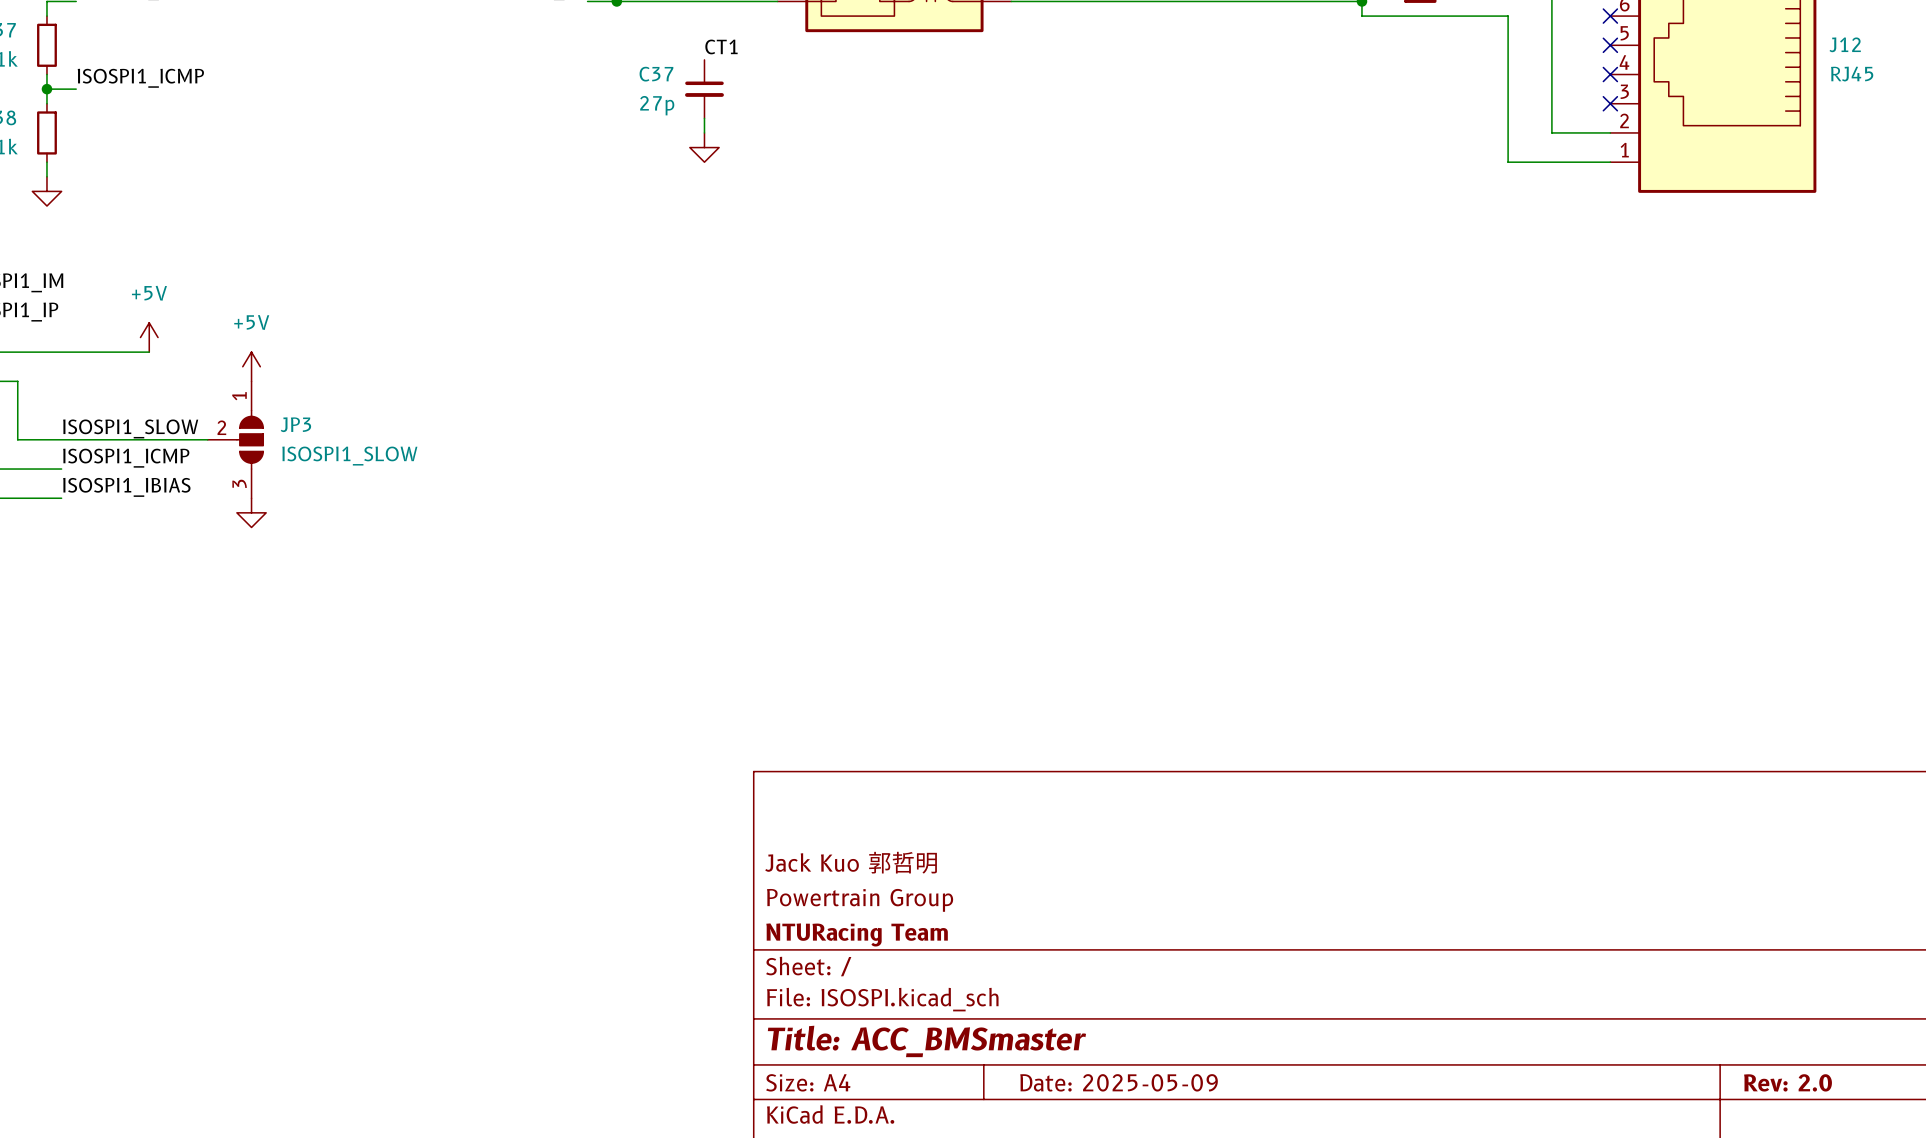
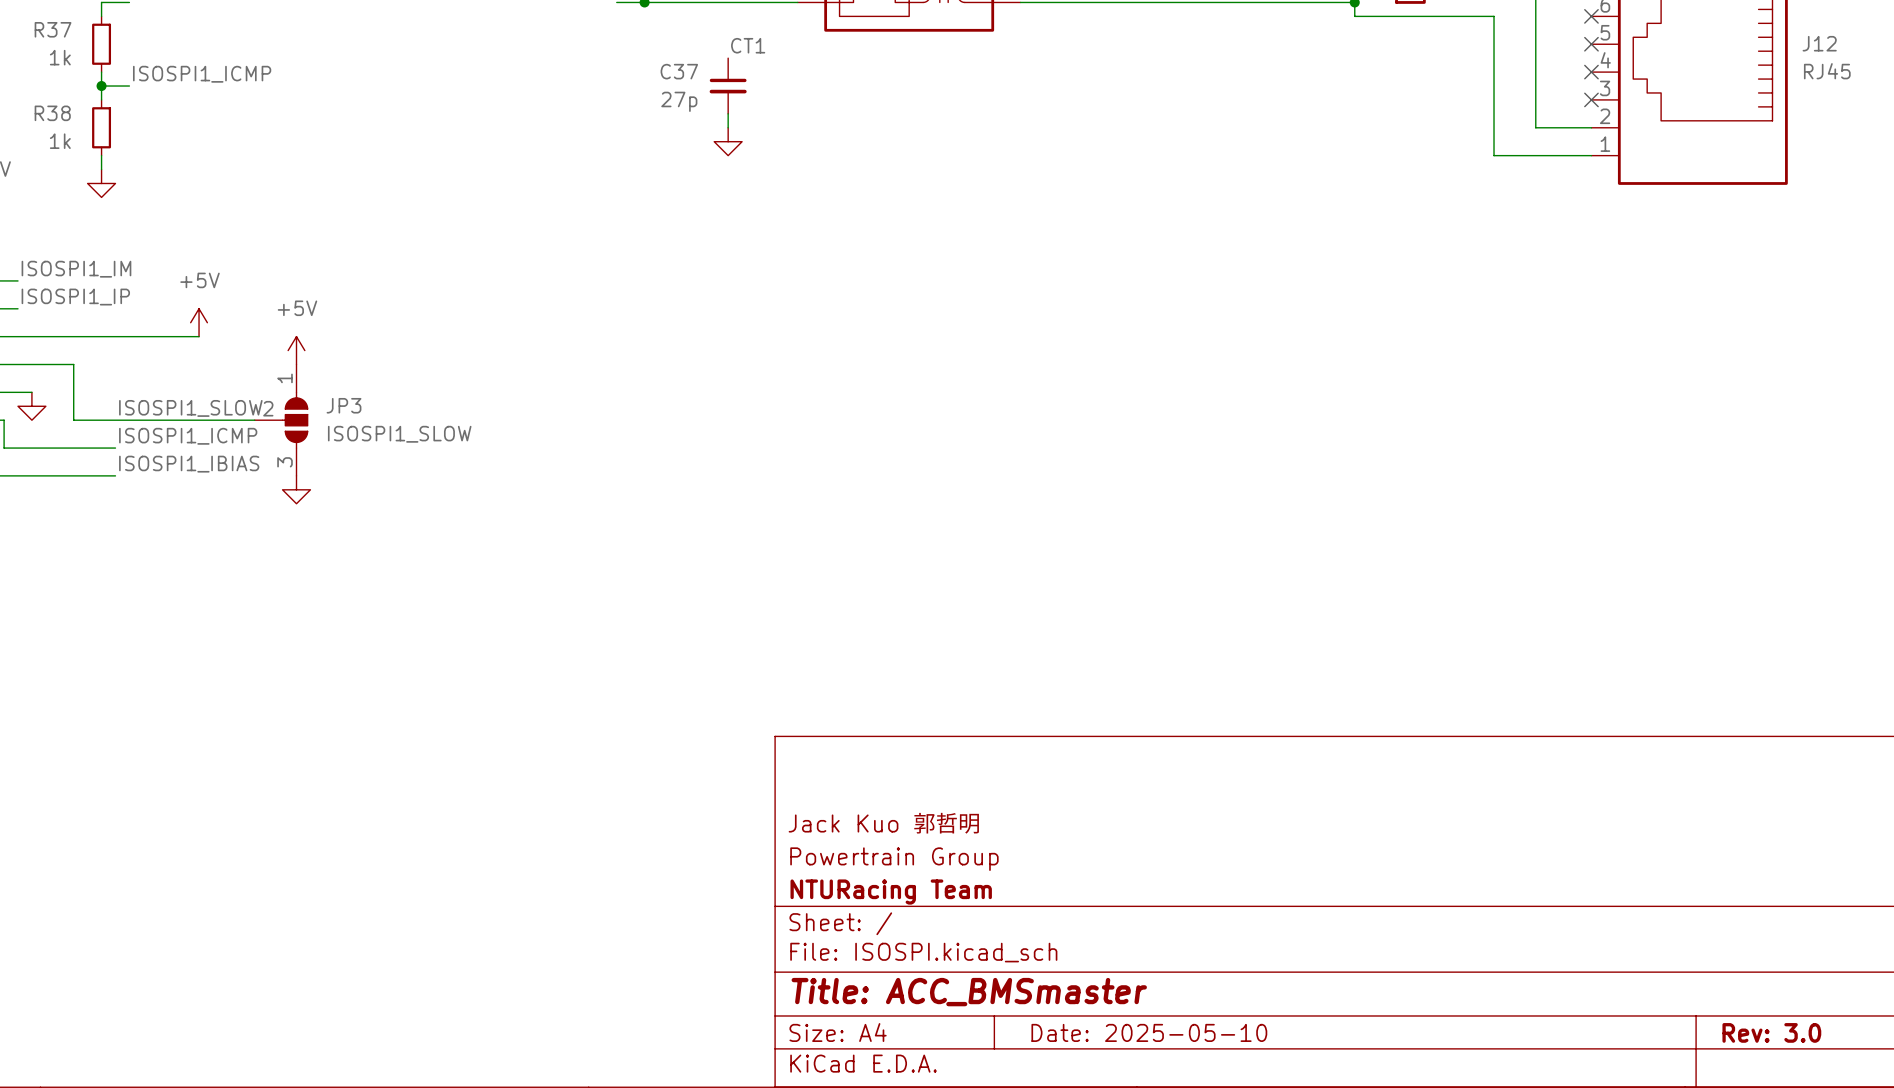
title block: Date: 2025-05-09 (1119, 1082) -> Date: 2025-05-10 (1149, 1032)
title block: Rev: 2.0 (1788, 1082) -> Rev: 3.0 (1771, 1032)

